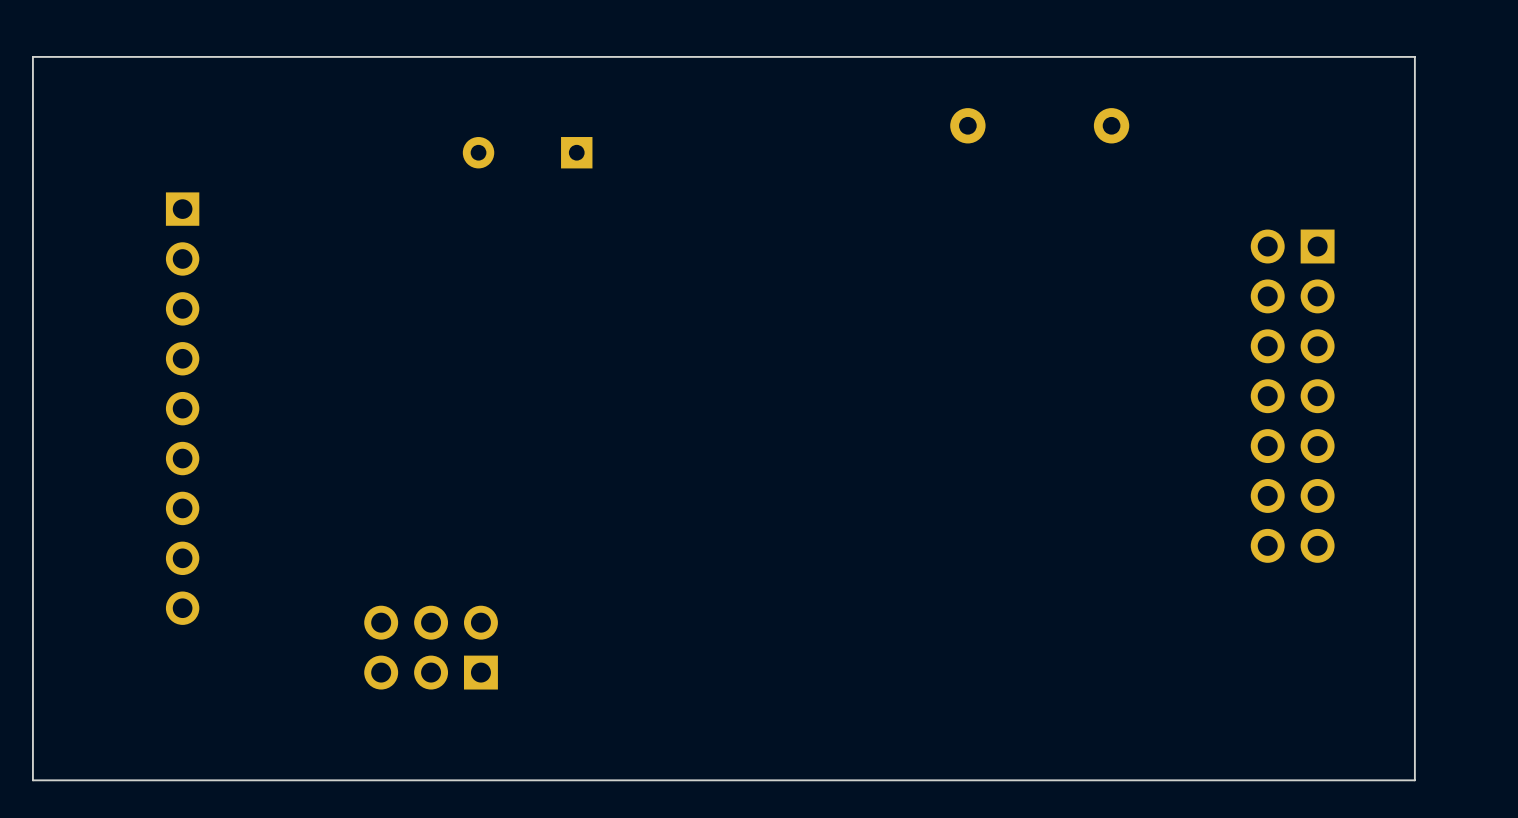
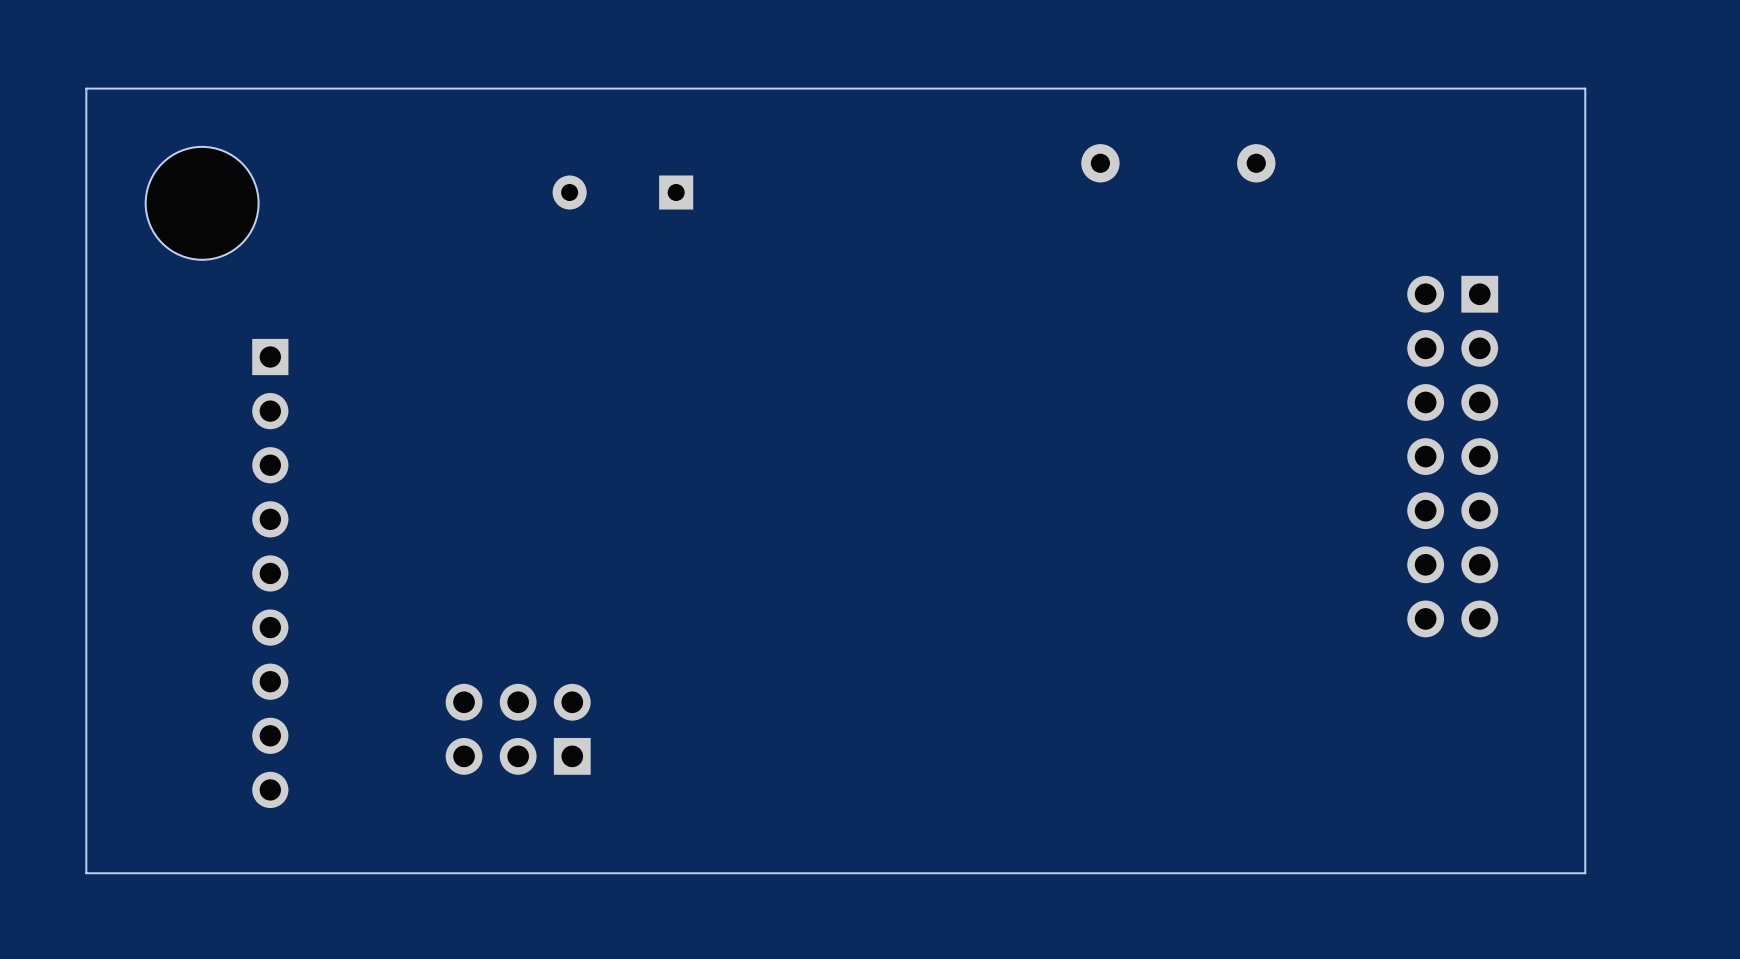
part: none -> (202, 203)
part position: (182, 408) -> (270, 573)

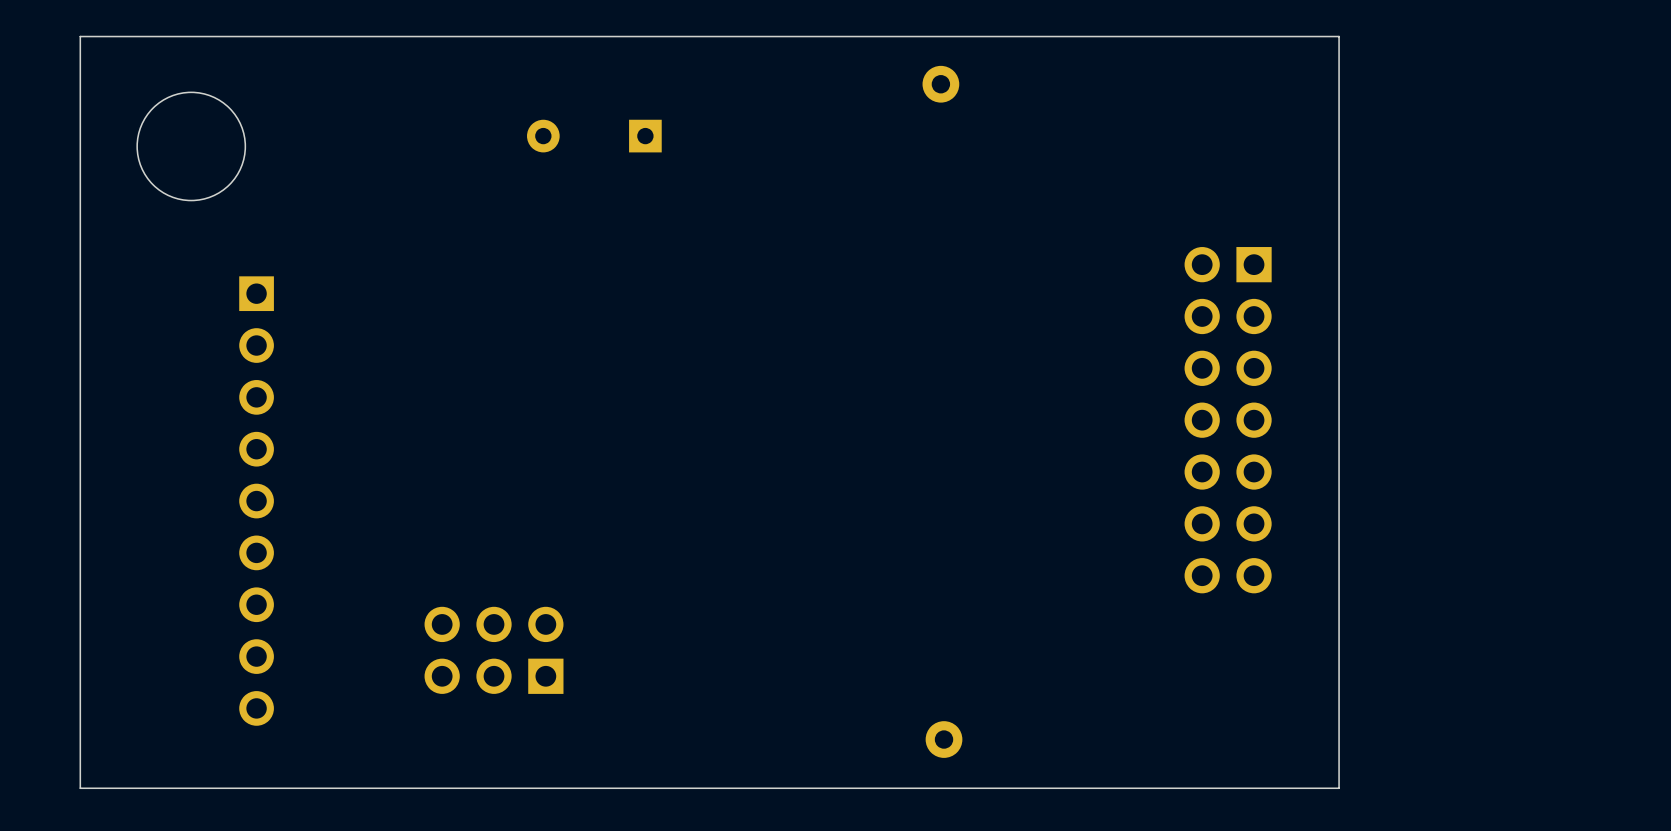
board edge: (1400, 88) (1585, 88) (1585, 873) (1400, 873) -> (1339, 36) (1339, 788)
part position: (1100, 163) -> (940, 84)
part: (1256, 163) -> none
part position: (1452, 456) -> (1228, 420)
part: none -> (944, 739)

